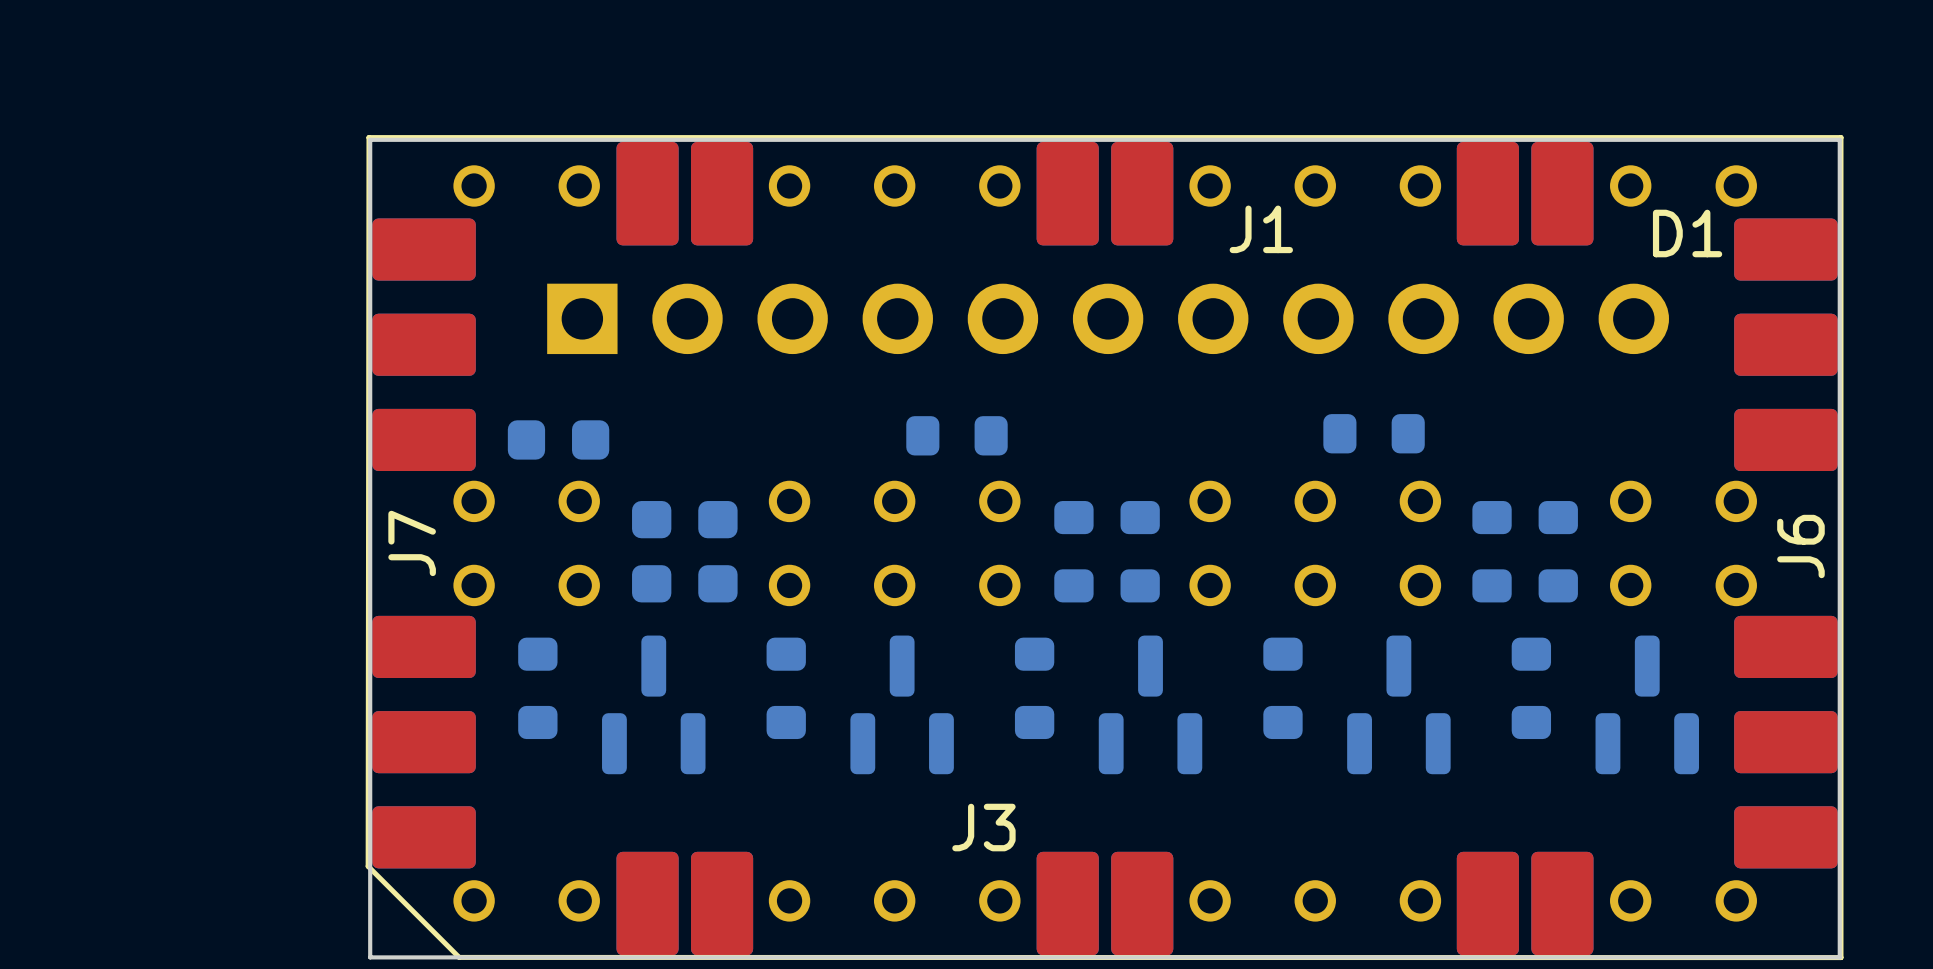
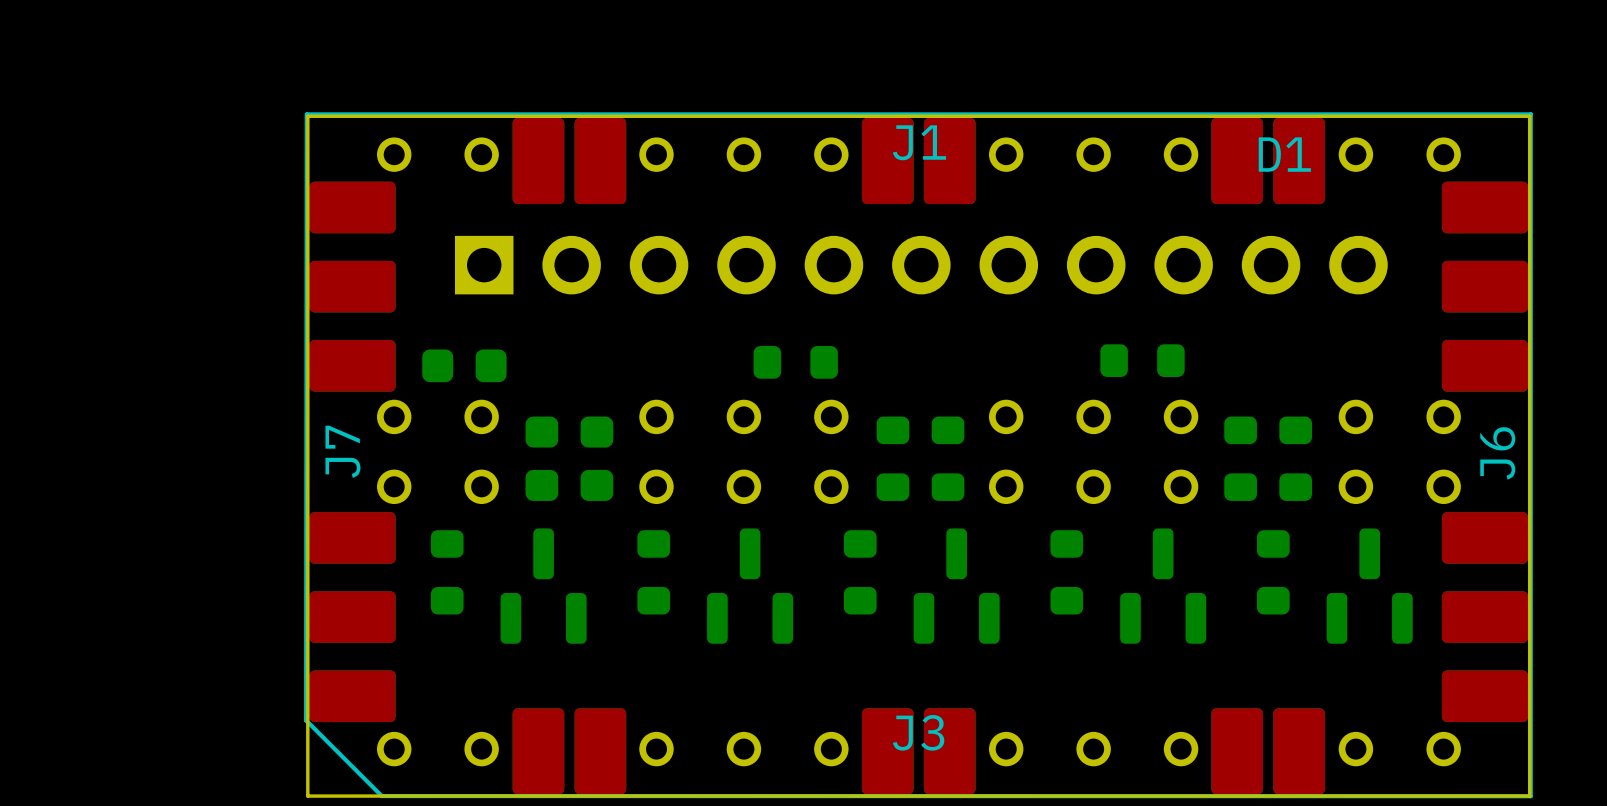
J1 name position: J1 (1261, 229) -> J1 (919, 142)
D1 name position: D1 (1687, 233) -> D1 (1284, 154)
J3 name position: J3 (983, 827) -> J3 (918, 732)

